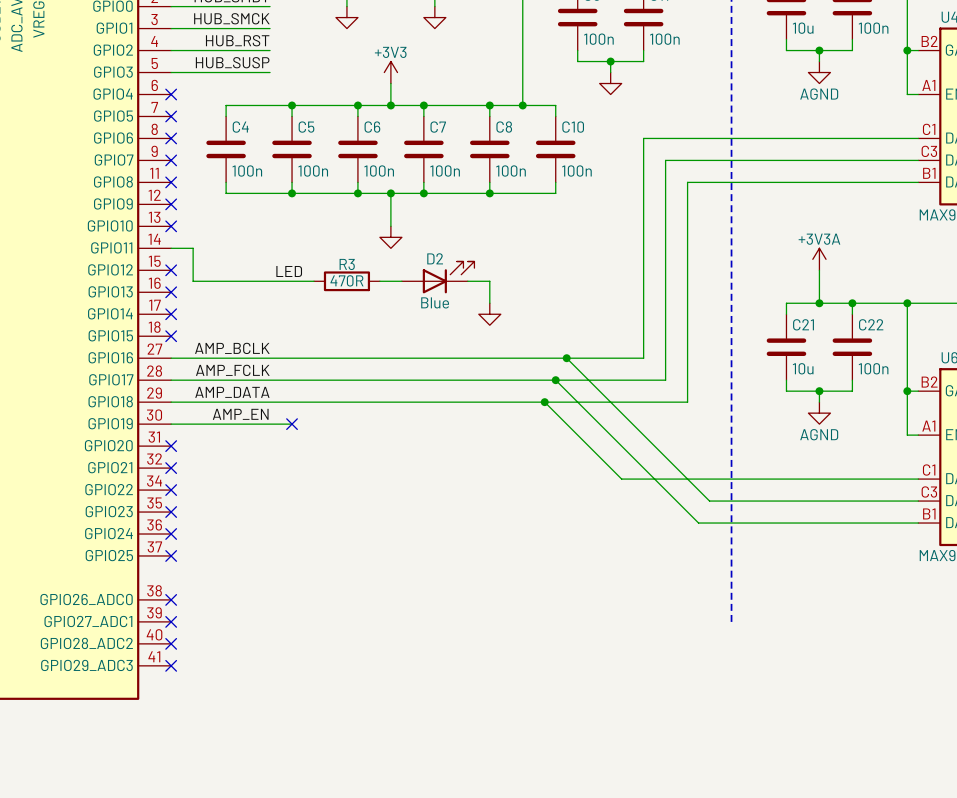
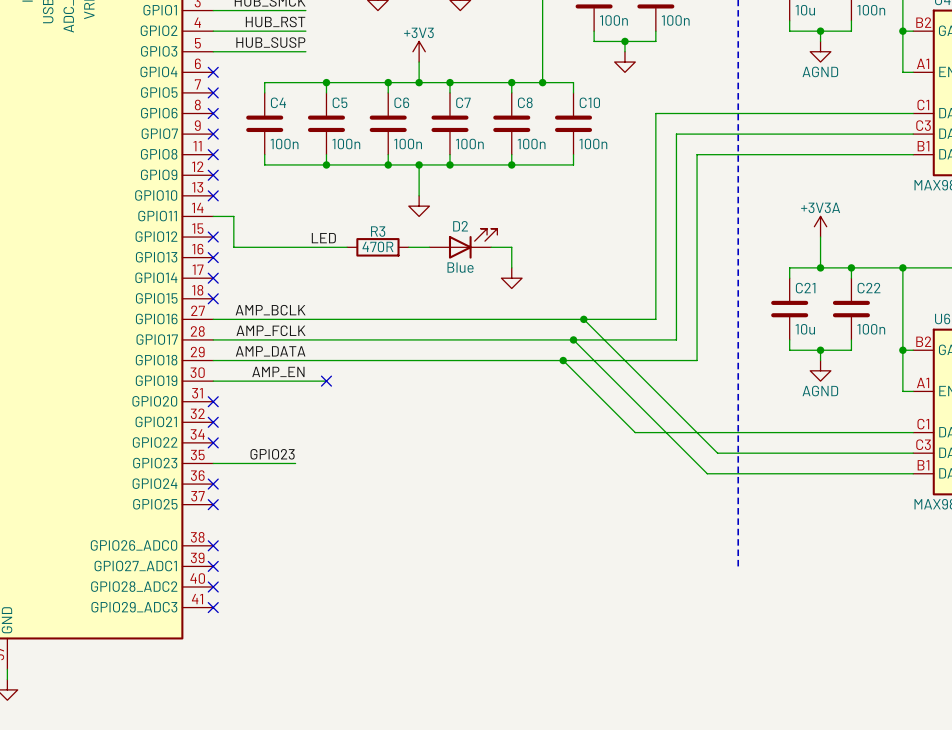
label: none -> GPIO23 (272, 454)
wire: none -> (213, 463) (295, 463)
no-connect mark: (171, 512) -> none

